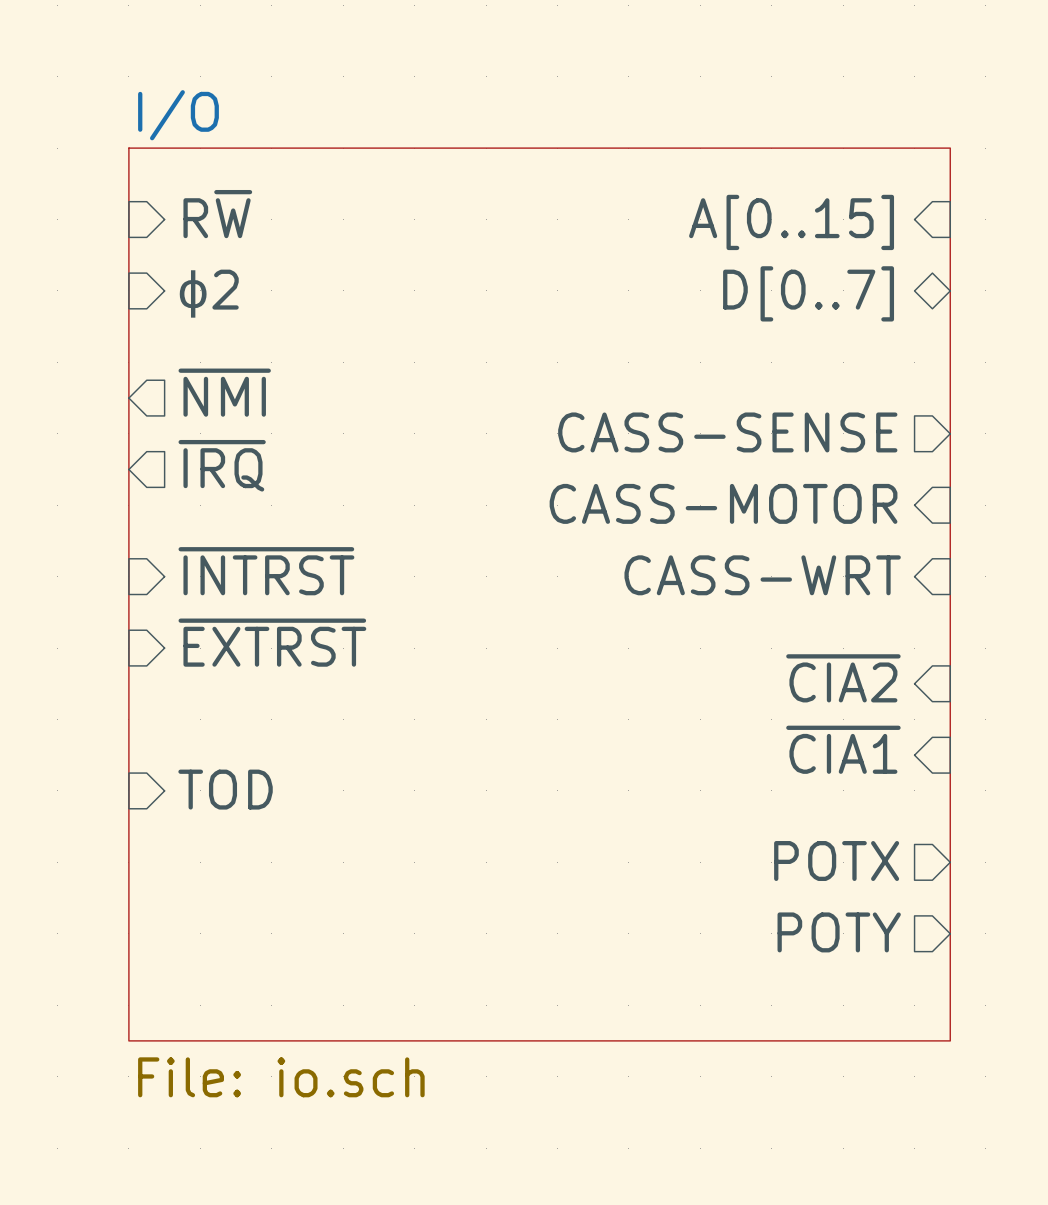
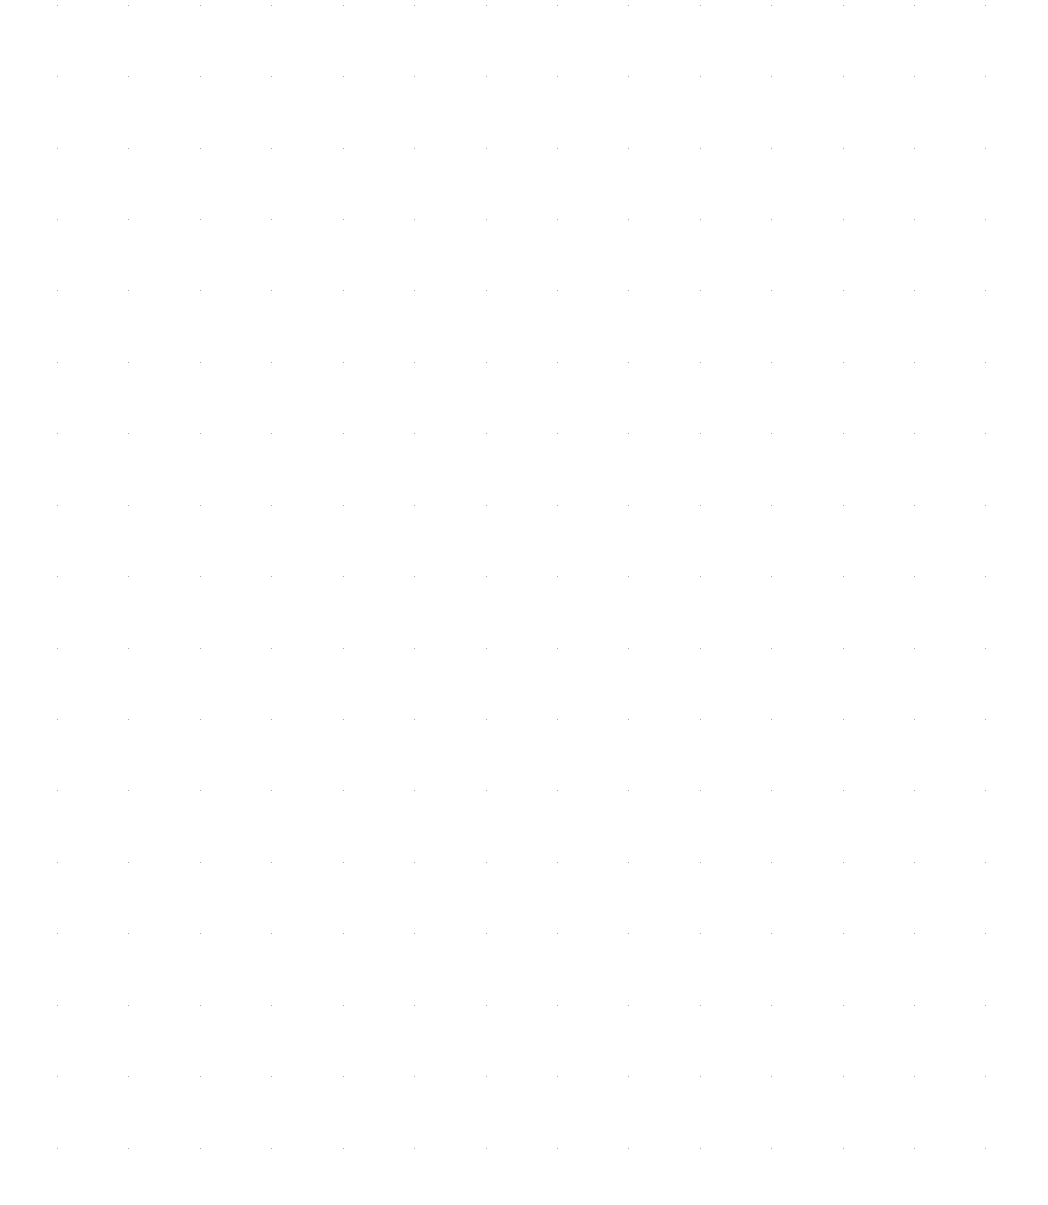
sheet pin: R~{W} (217, 214) -> none
sheet pin: A[0..15] (791, 222) -> none
sheet pin: ϕ2 (208, 293) -> none
sheet pin: D[0..7] (808, 293) -> none
sheet pin: ~{NMI} (224, 392) -> none
sheet pin: CASS-SENSE (727, 432) -> none
sheet pin: ~{IRQ} (222, 465) -> none
sheet pin: CASS-MOTOR (723, 503) -> none
sheet pin: ~{INTRST} (266, 571) -> none
sheet pin: CASS-WRT (762, 575) -> none
sheet I/O: File: io.sch (539, 594) -> none
sheet pin: ~{EXTRST} (272, 642) -> none
sheet pin: ~{CIA2} (843, 678) -> none
sheet pin: ~{CIA1} (843, 749) -> none
sheet pin: TOD (225, 789) -> none
sheet pin: POTX (836, 861) -> none
sheet pin: POTY (839, 932) -> none

